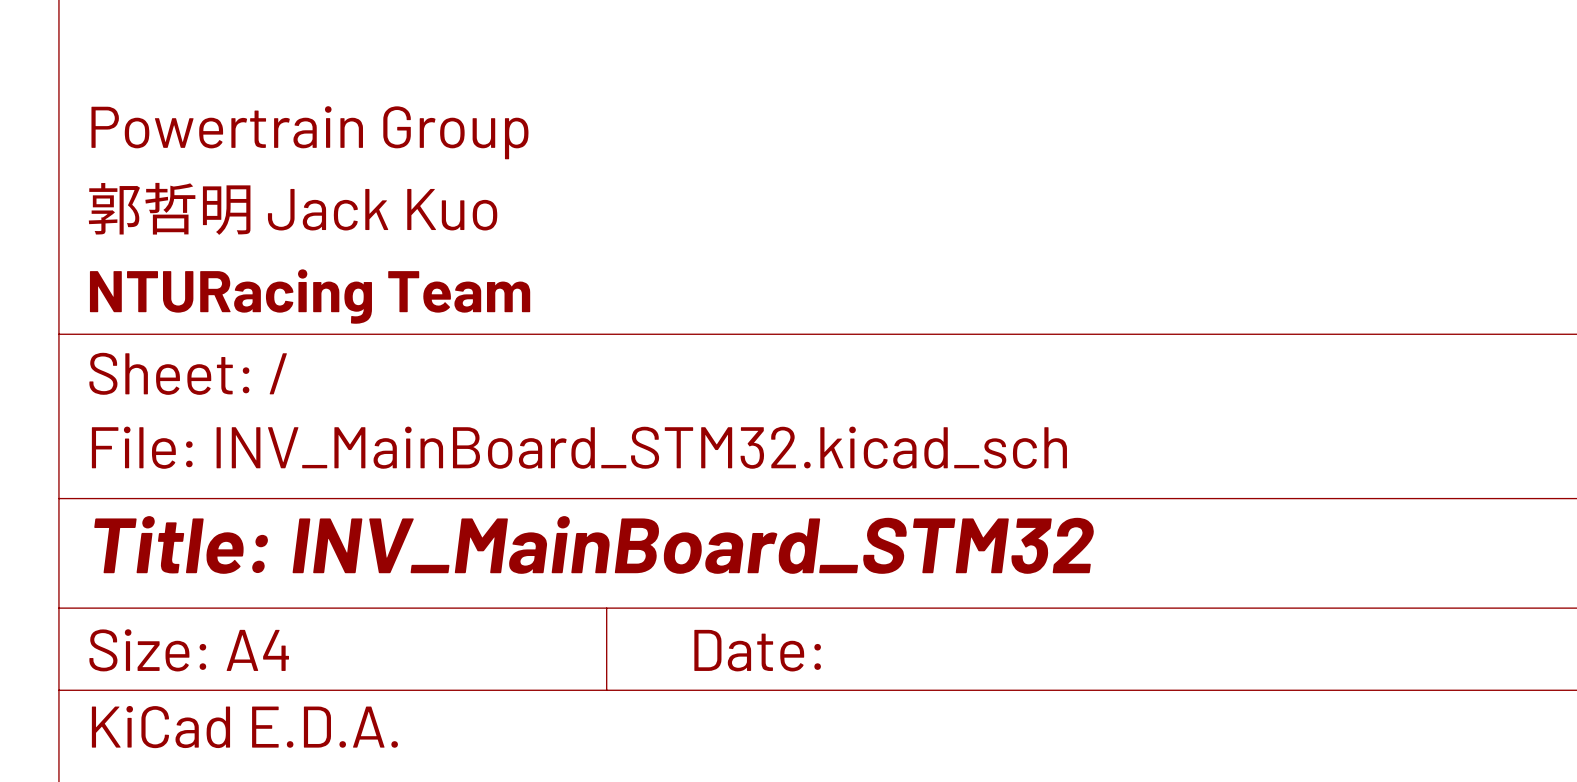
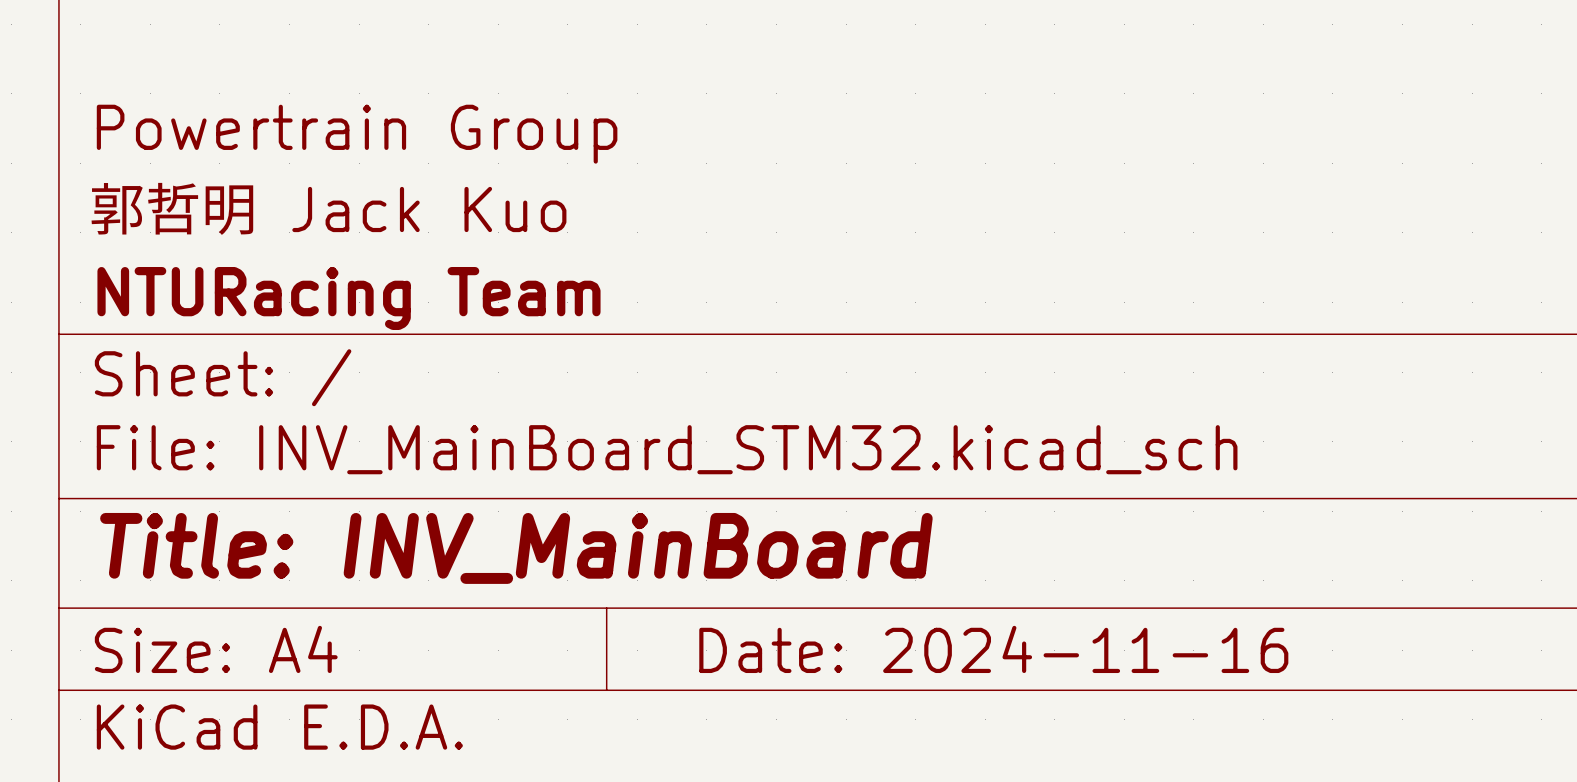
title block: Title: INV_MainBoard_STM32 (594, 544) -> Title: INV_MainBoard (516, 548)
title block: Date: (757, 650) -> Date: 2024-11-16 (993, 649)

